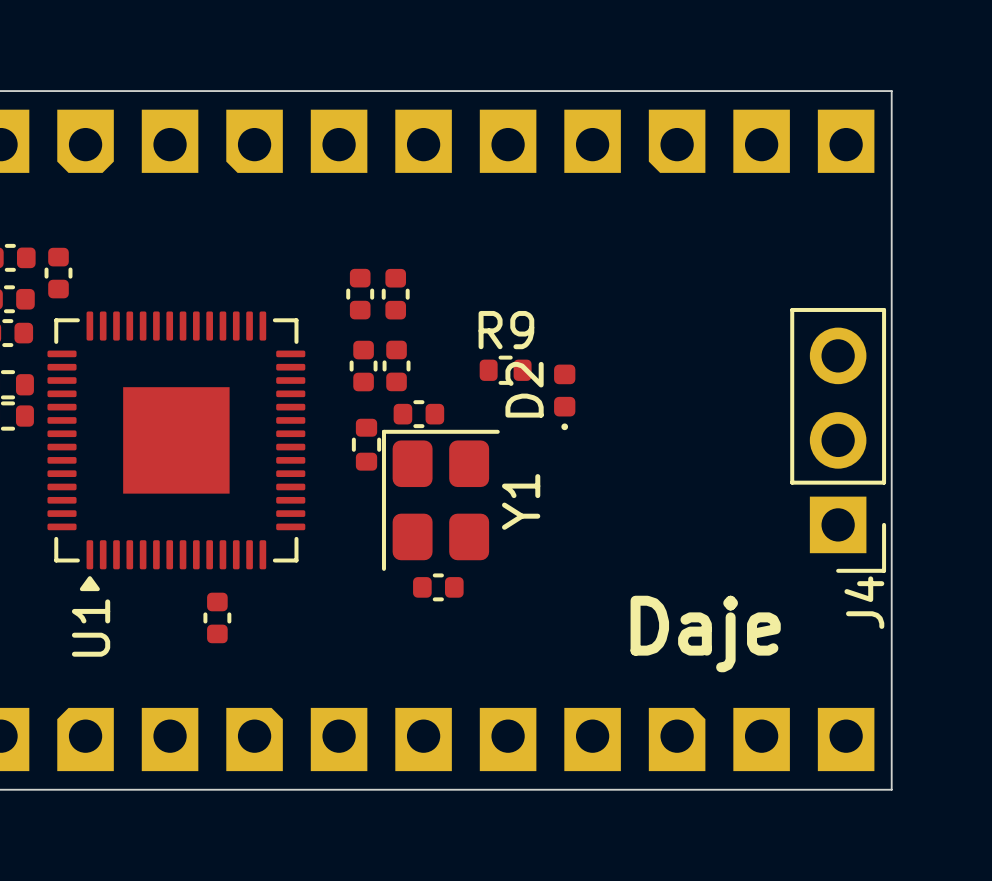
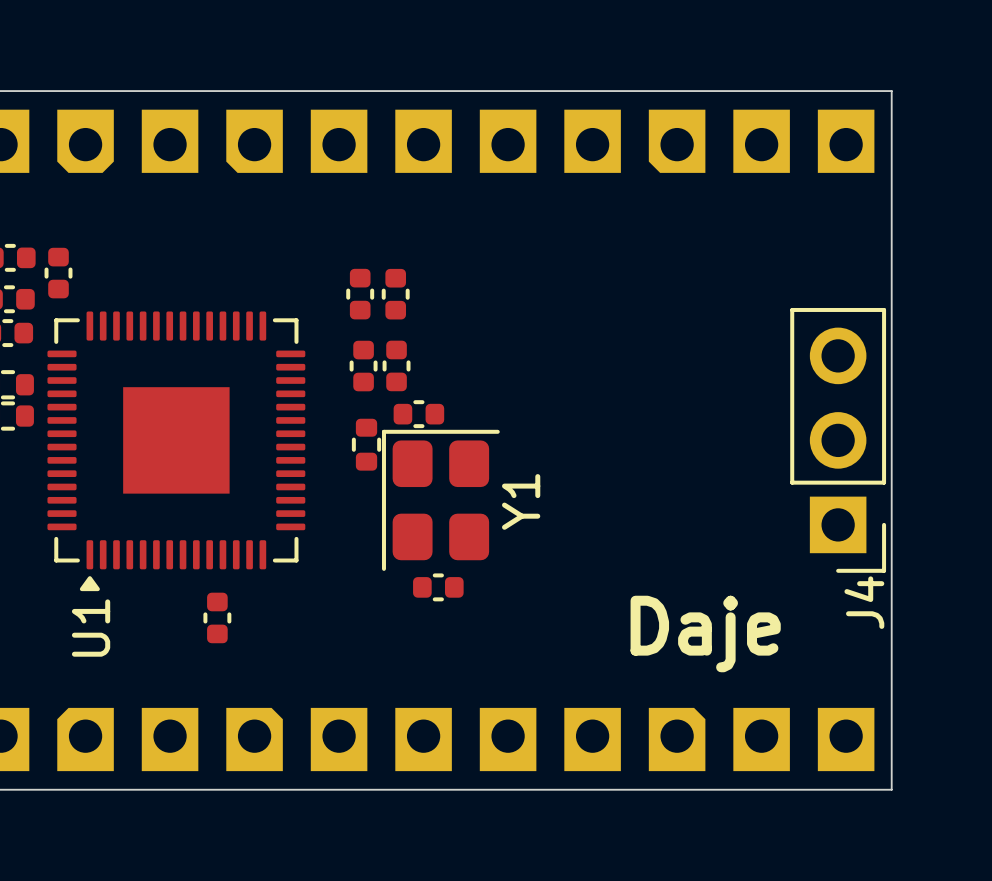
R9: (505, 370) -> none
D2: (564, 397) -> none

